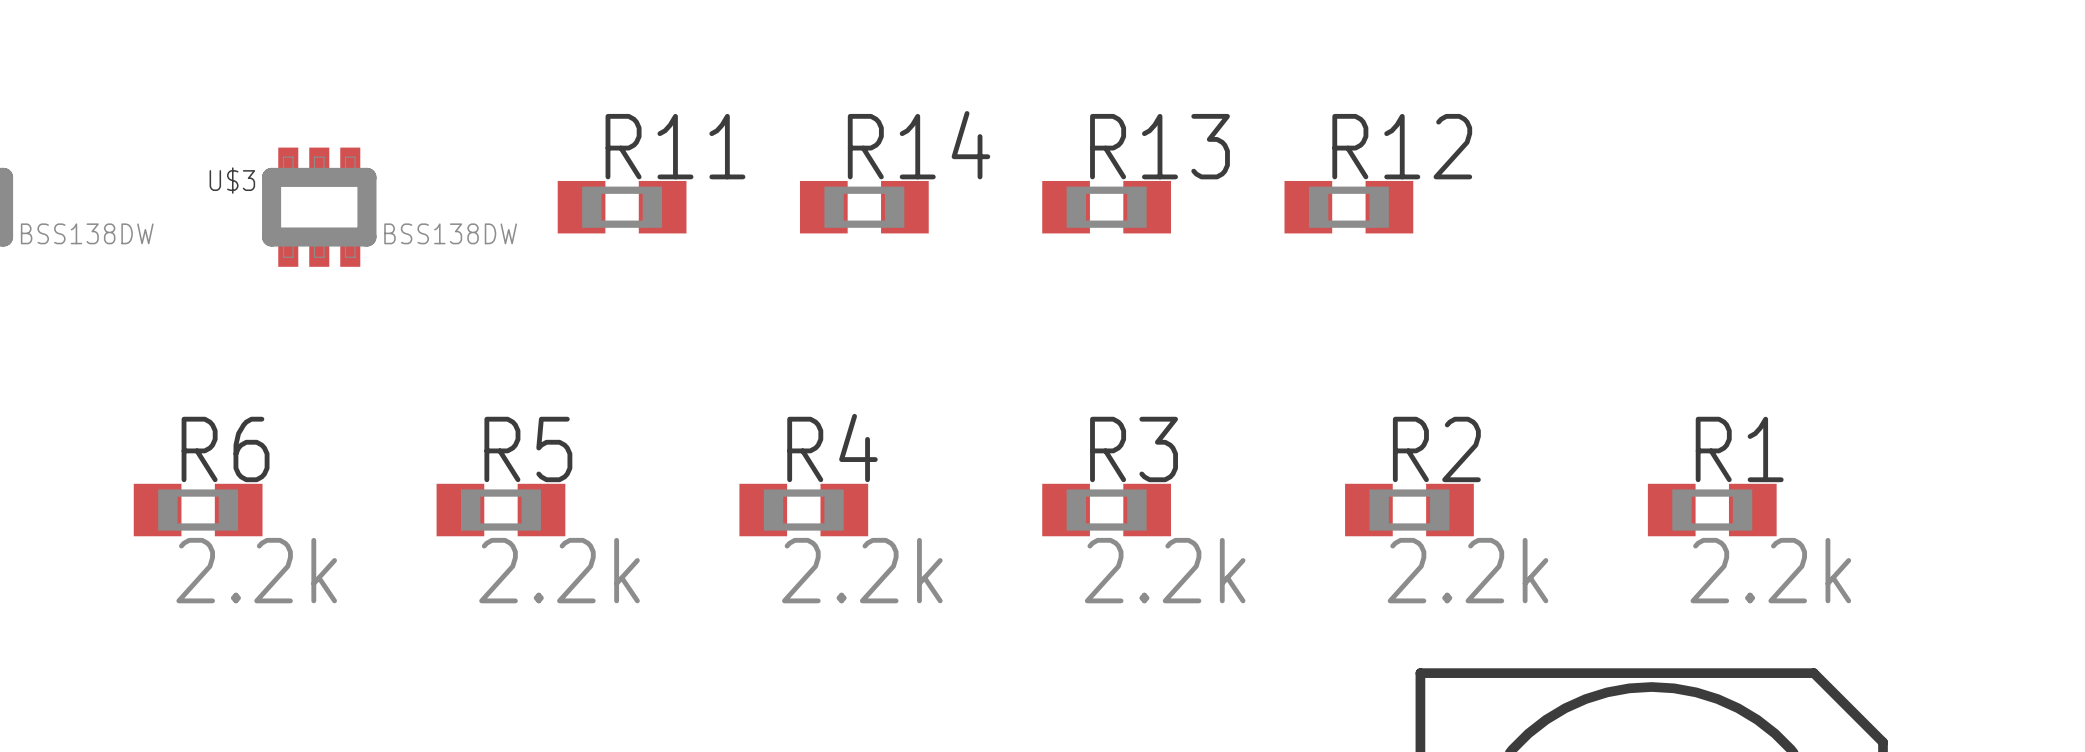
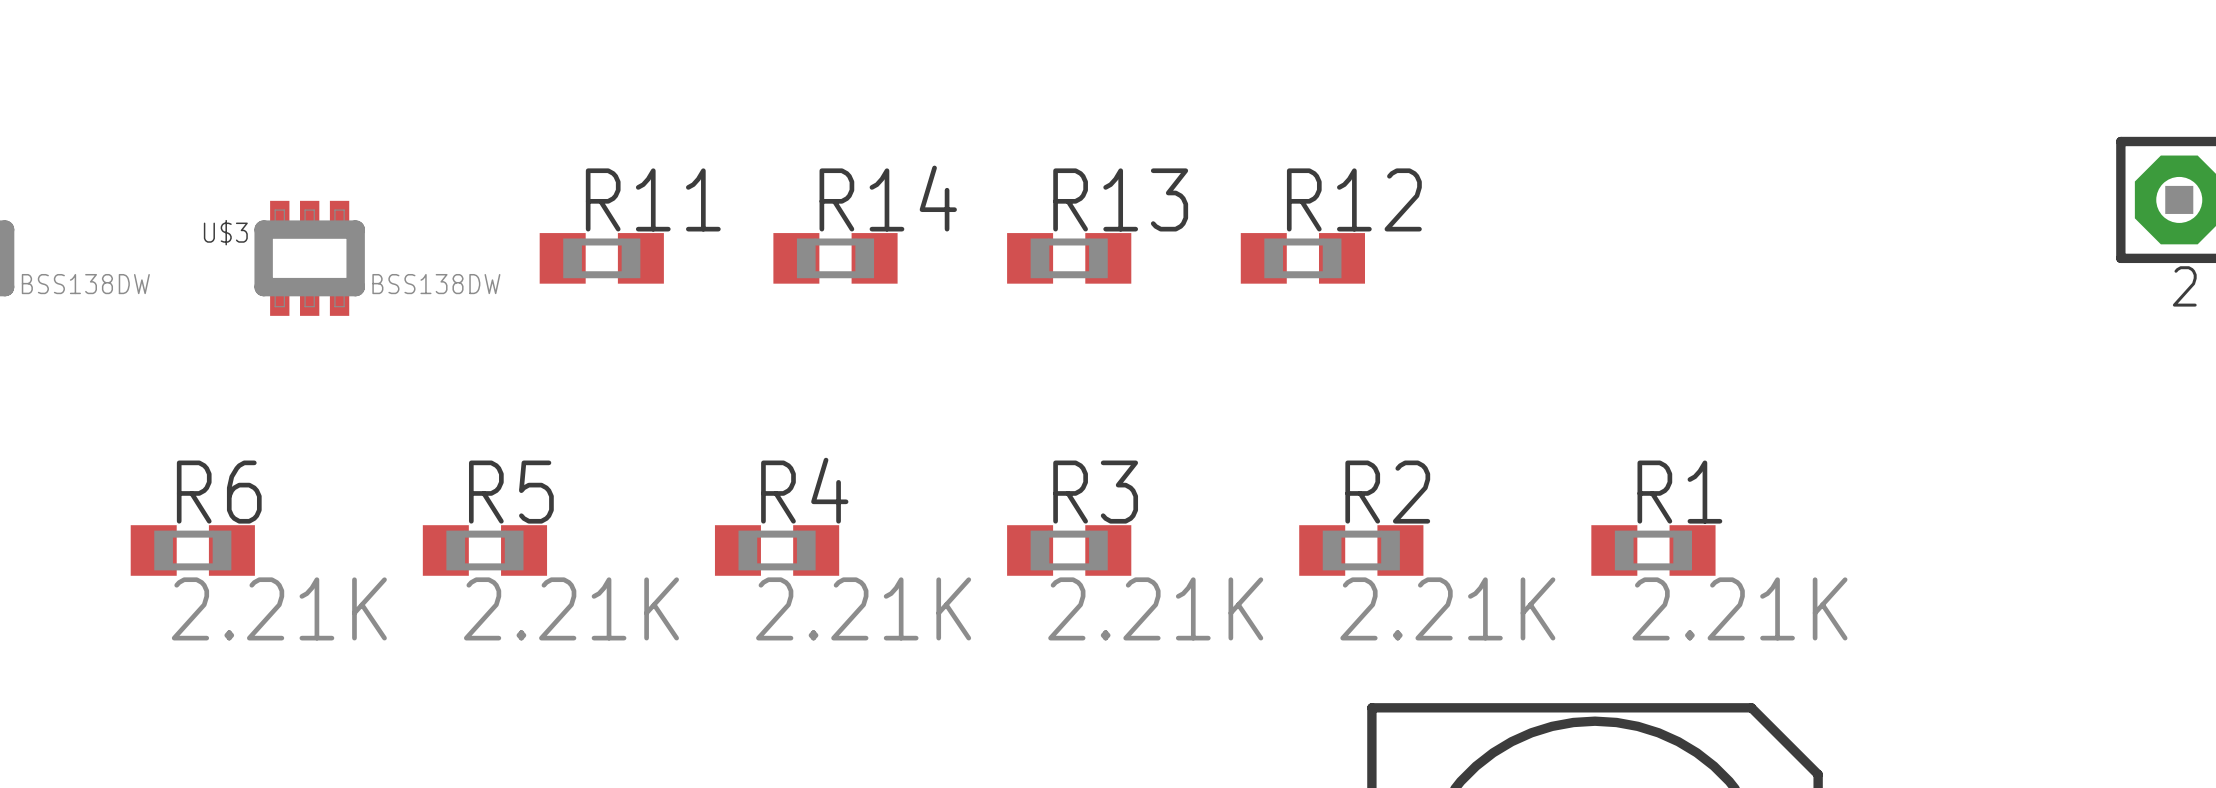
R6 value: 2.2k (256, 570) -> 2.21K (279, 608)
R5 value: 2.2k (559, 570) -> 2.21K (571, 608)
R4 value: 2.2k (862, 570) -> 2.21K (863, 608)
R3 value: 2.2k (1165, 570) -> 2.21K (1155, 608)
R2 value: 2.2k (1468, 570) -> 2.21K (1447, 608)
R1 value: 2.2k (1770, 570) -> 2.21K (1739, 608)

